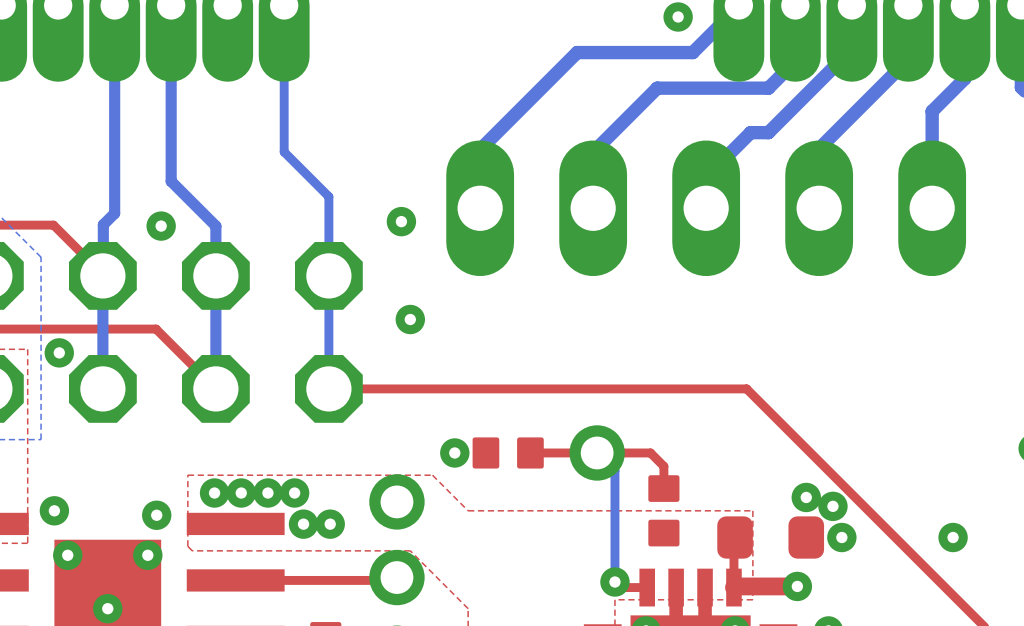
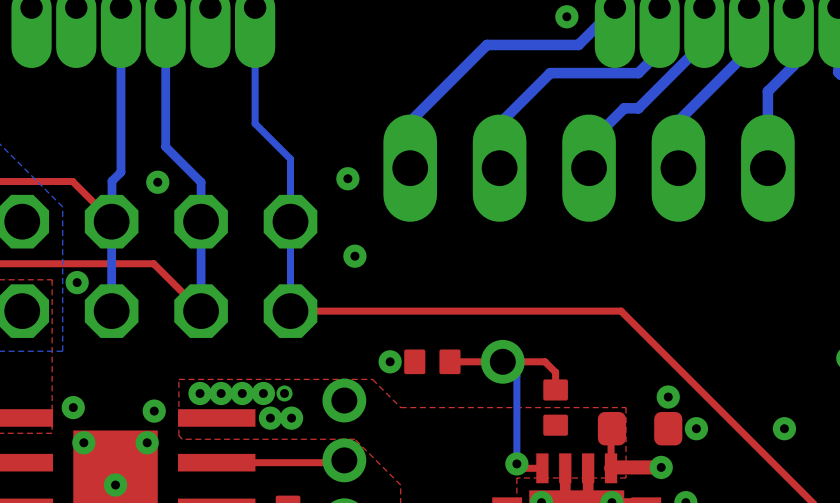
via: none -> (284, 393)
via: (832, 506) -> none

